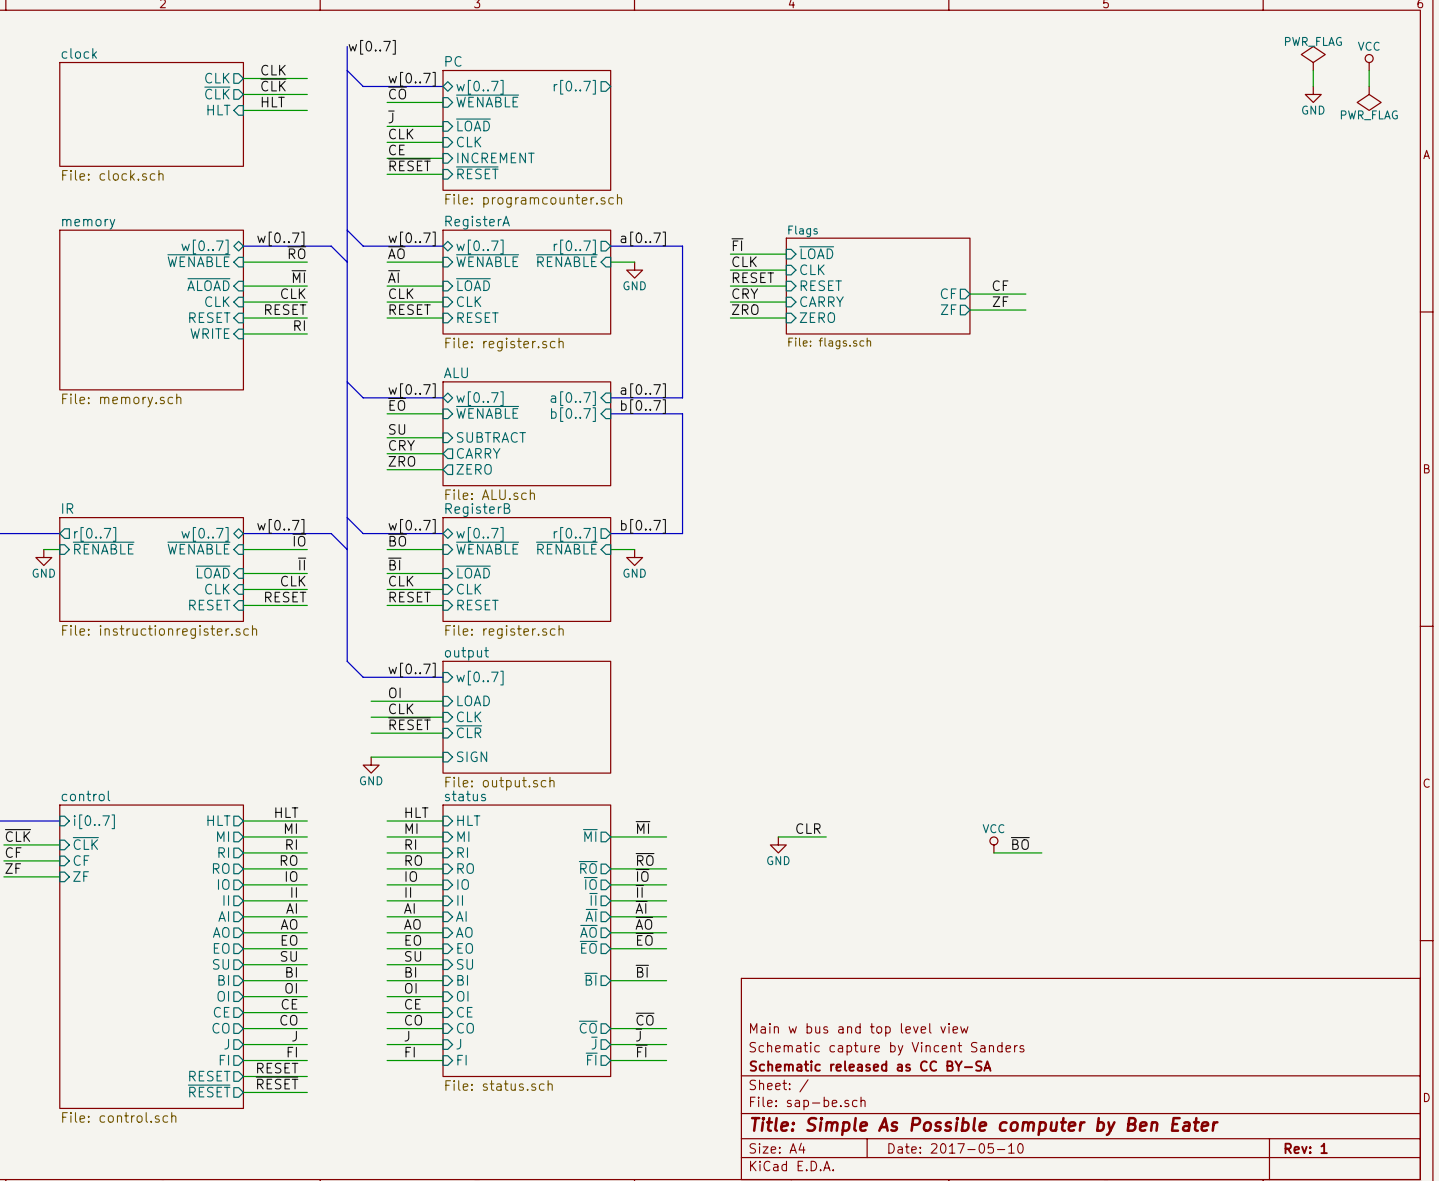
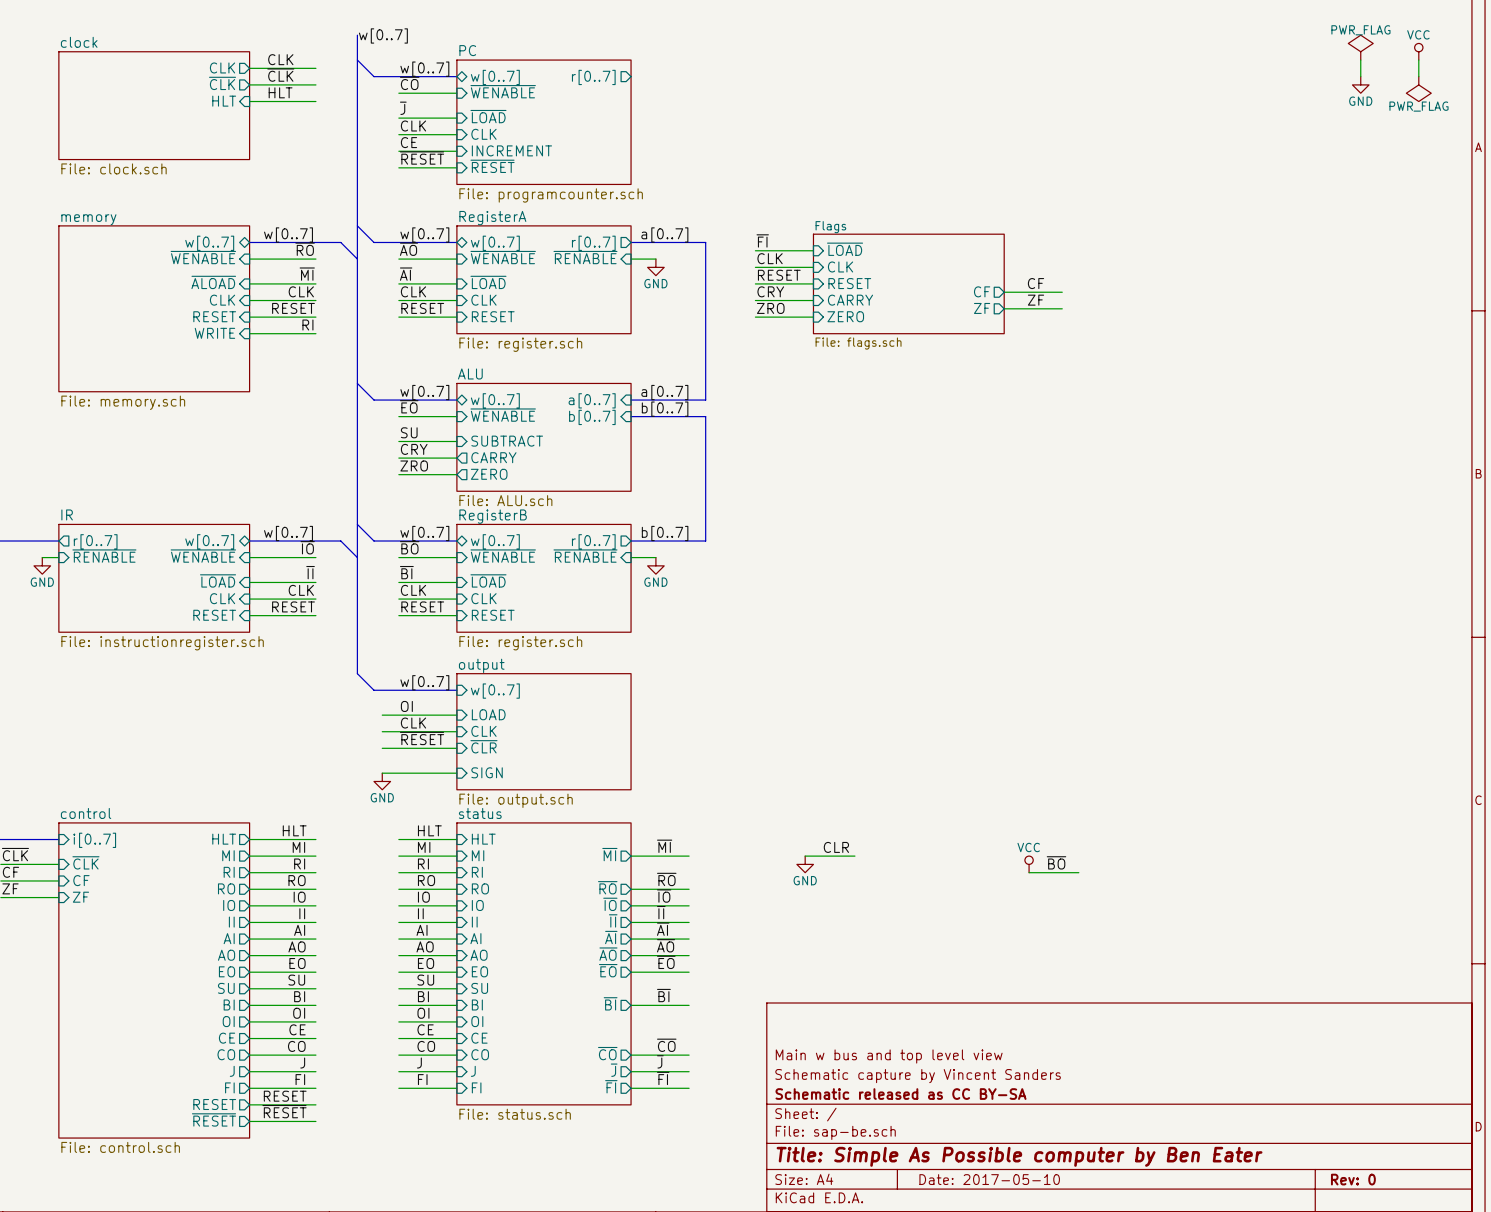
title block: Rev: 1 (1306, 1148) -> Rev: 0 (1353, 1179)

